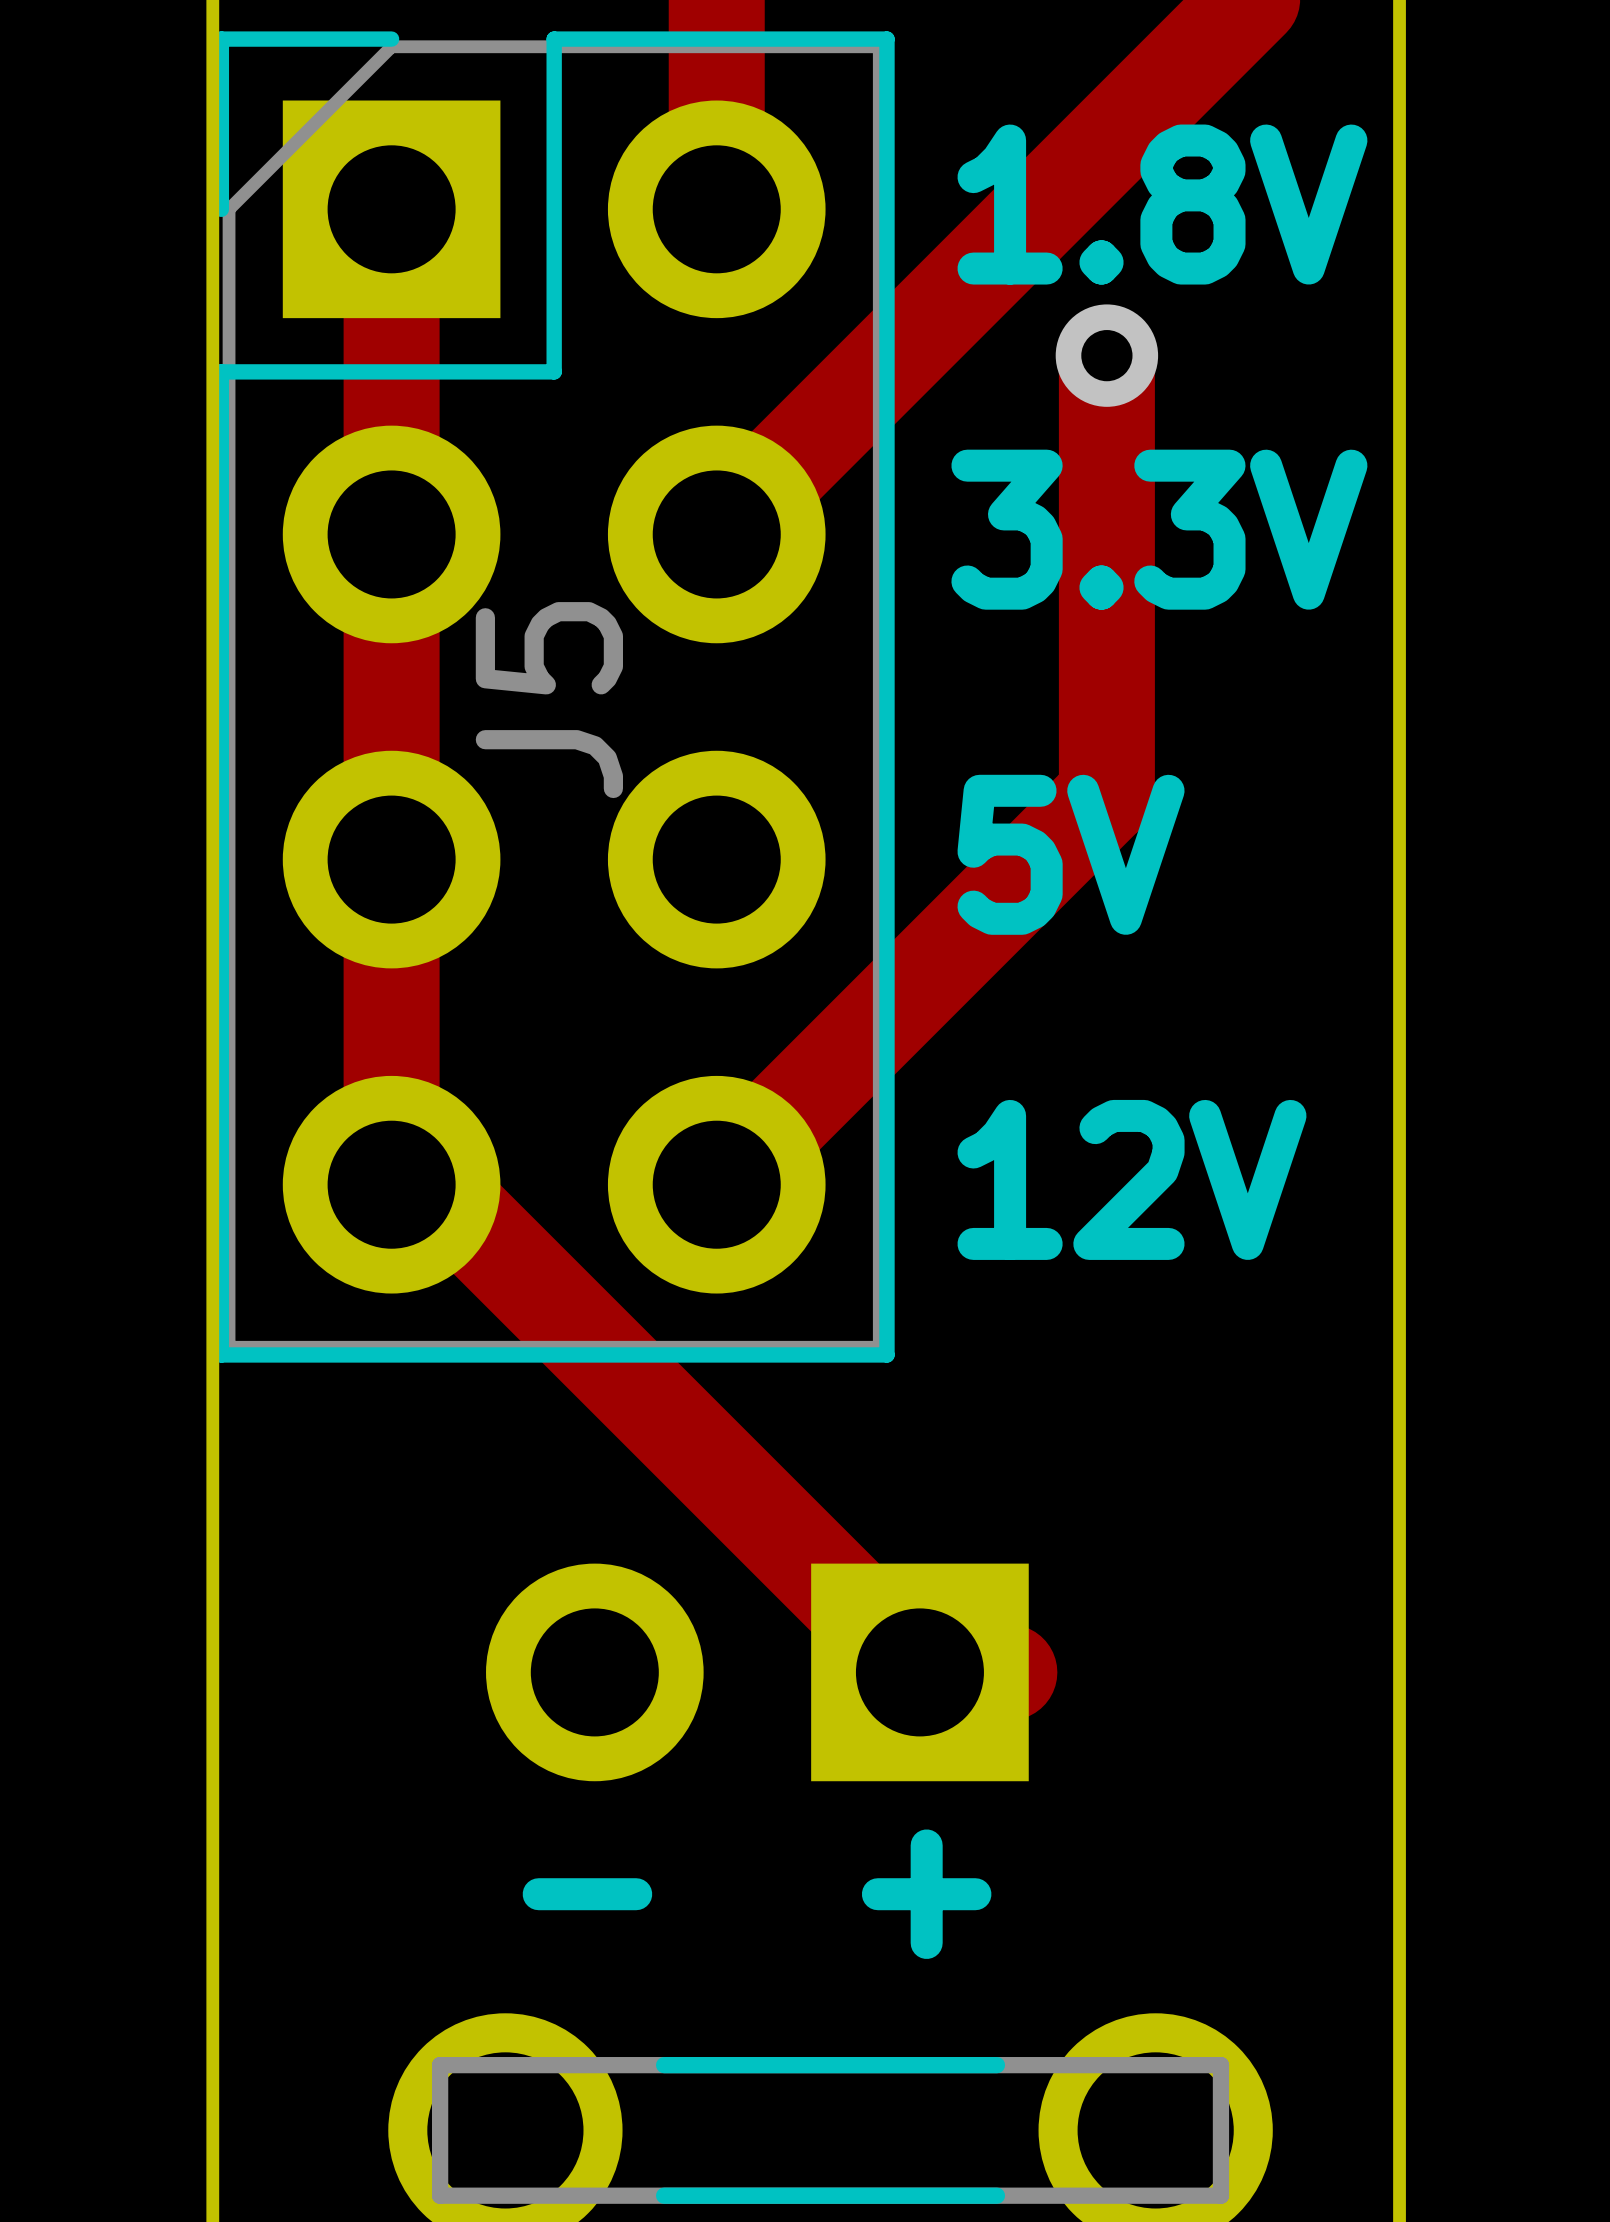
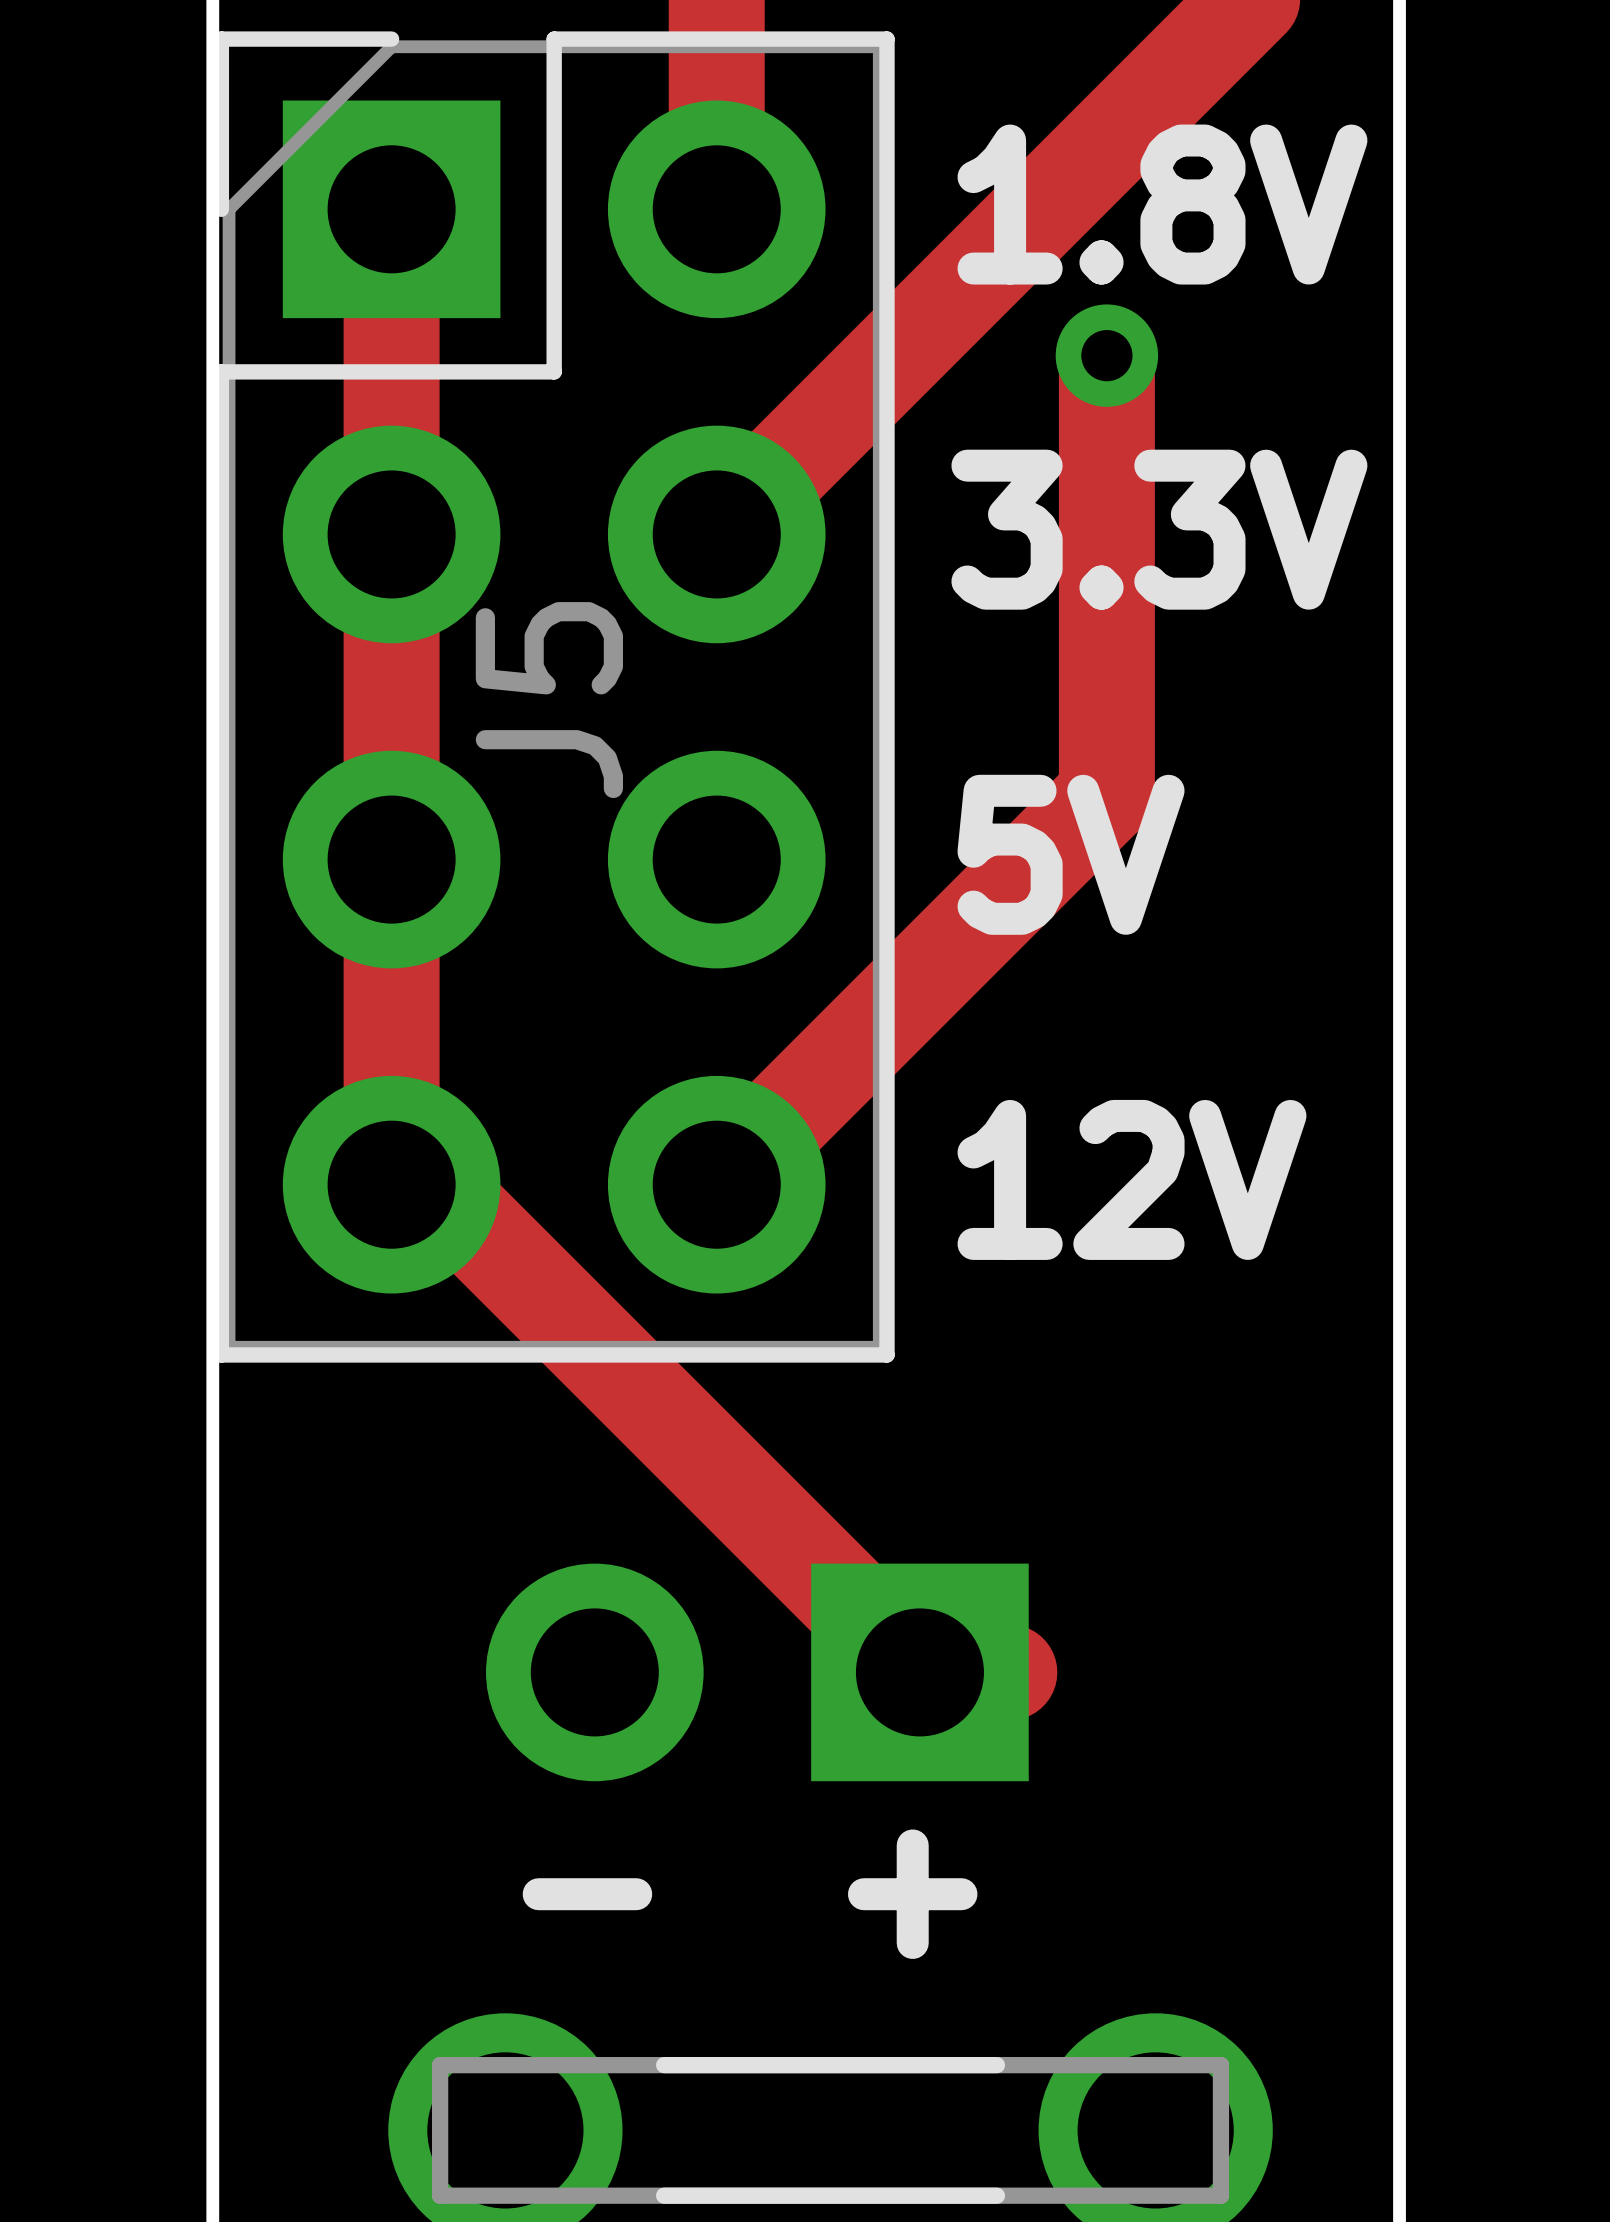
text position: + (926, 1894) -> + (912, 1894)

